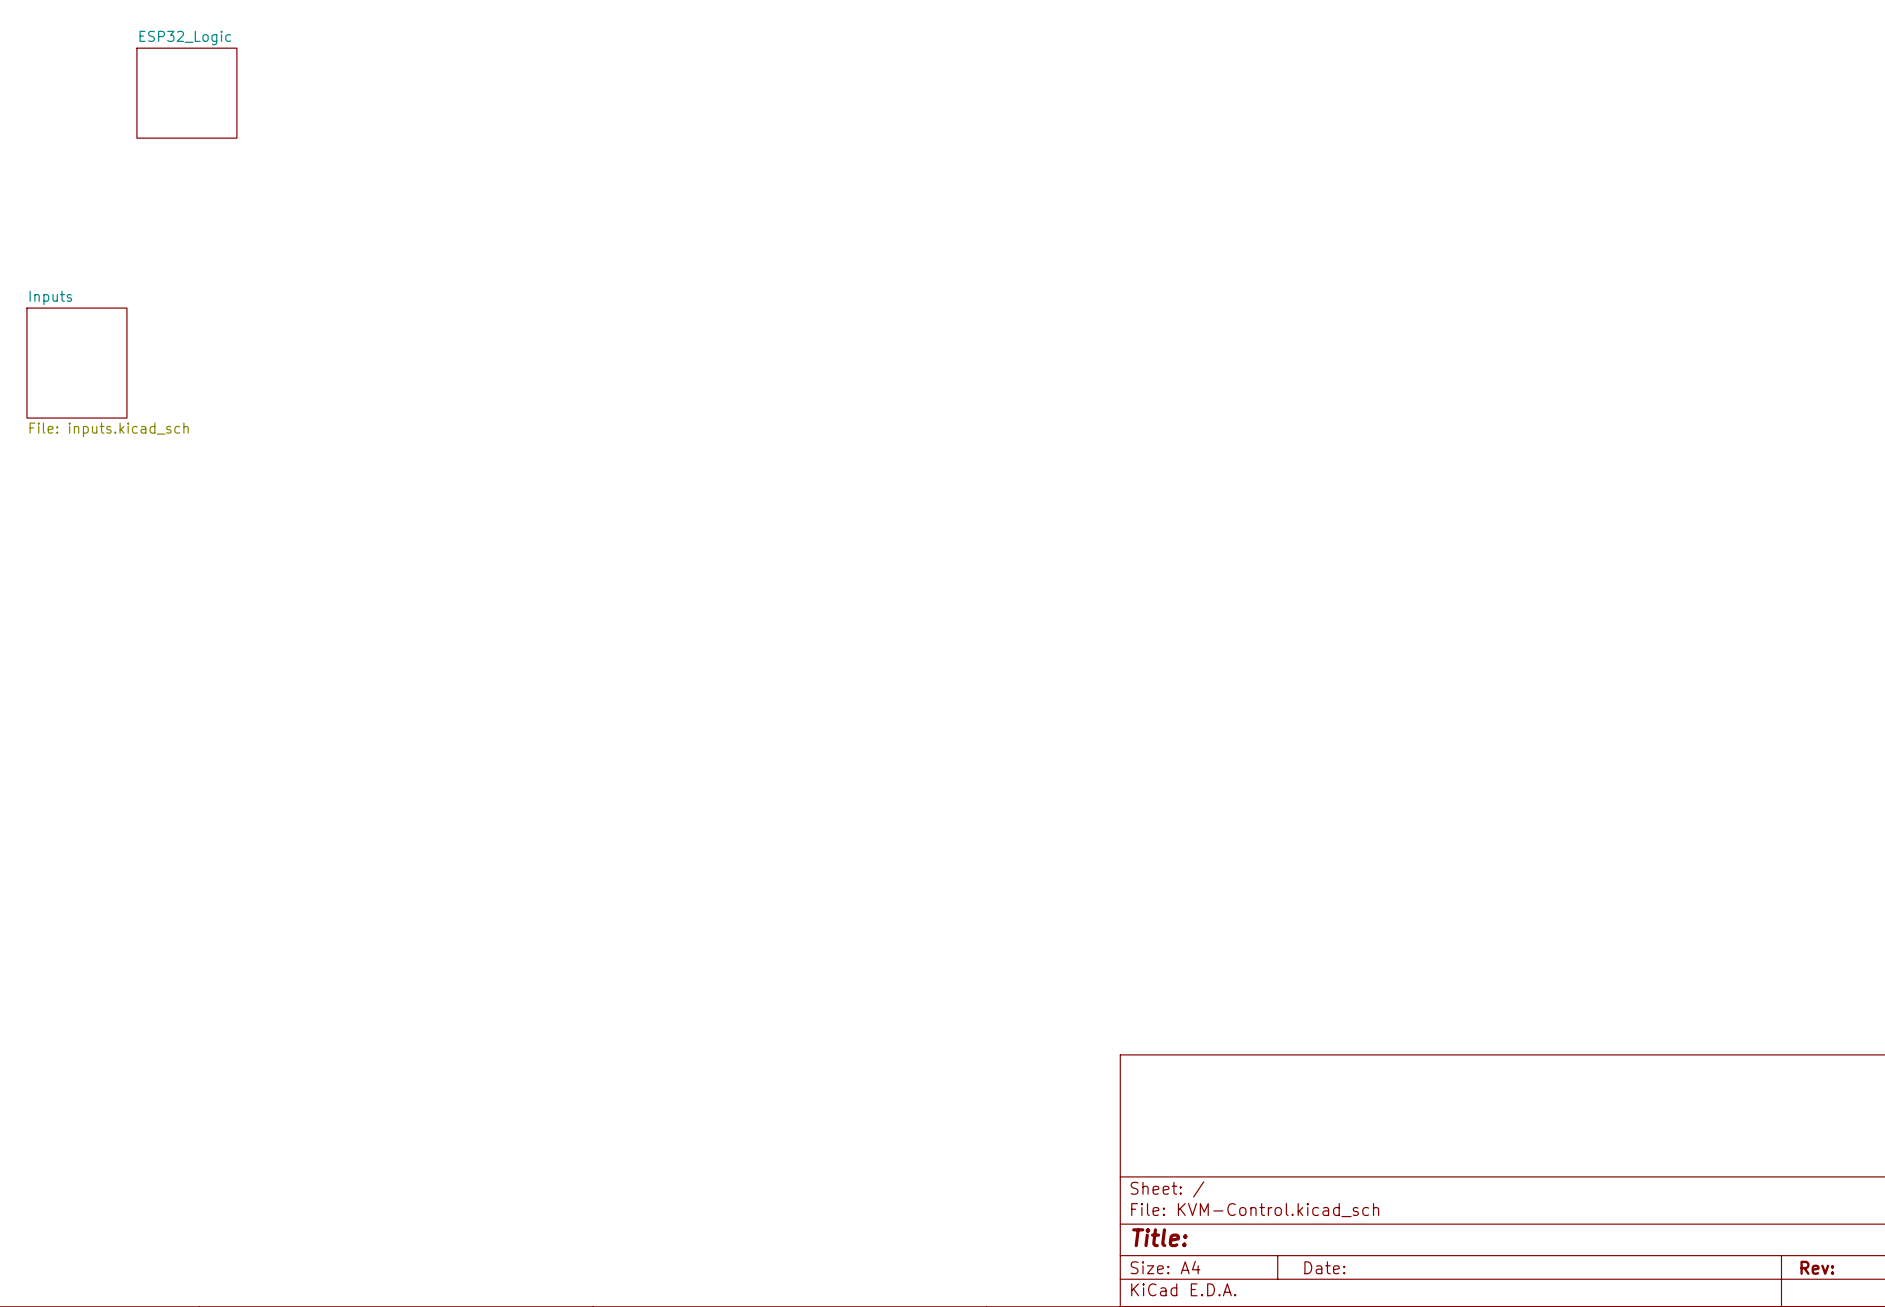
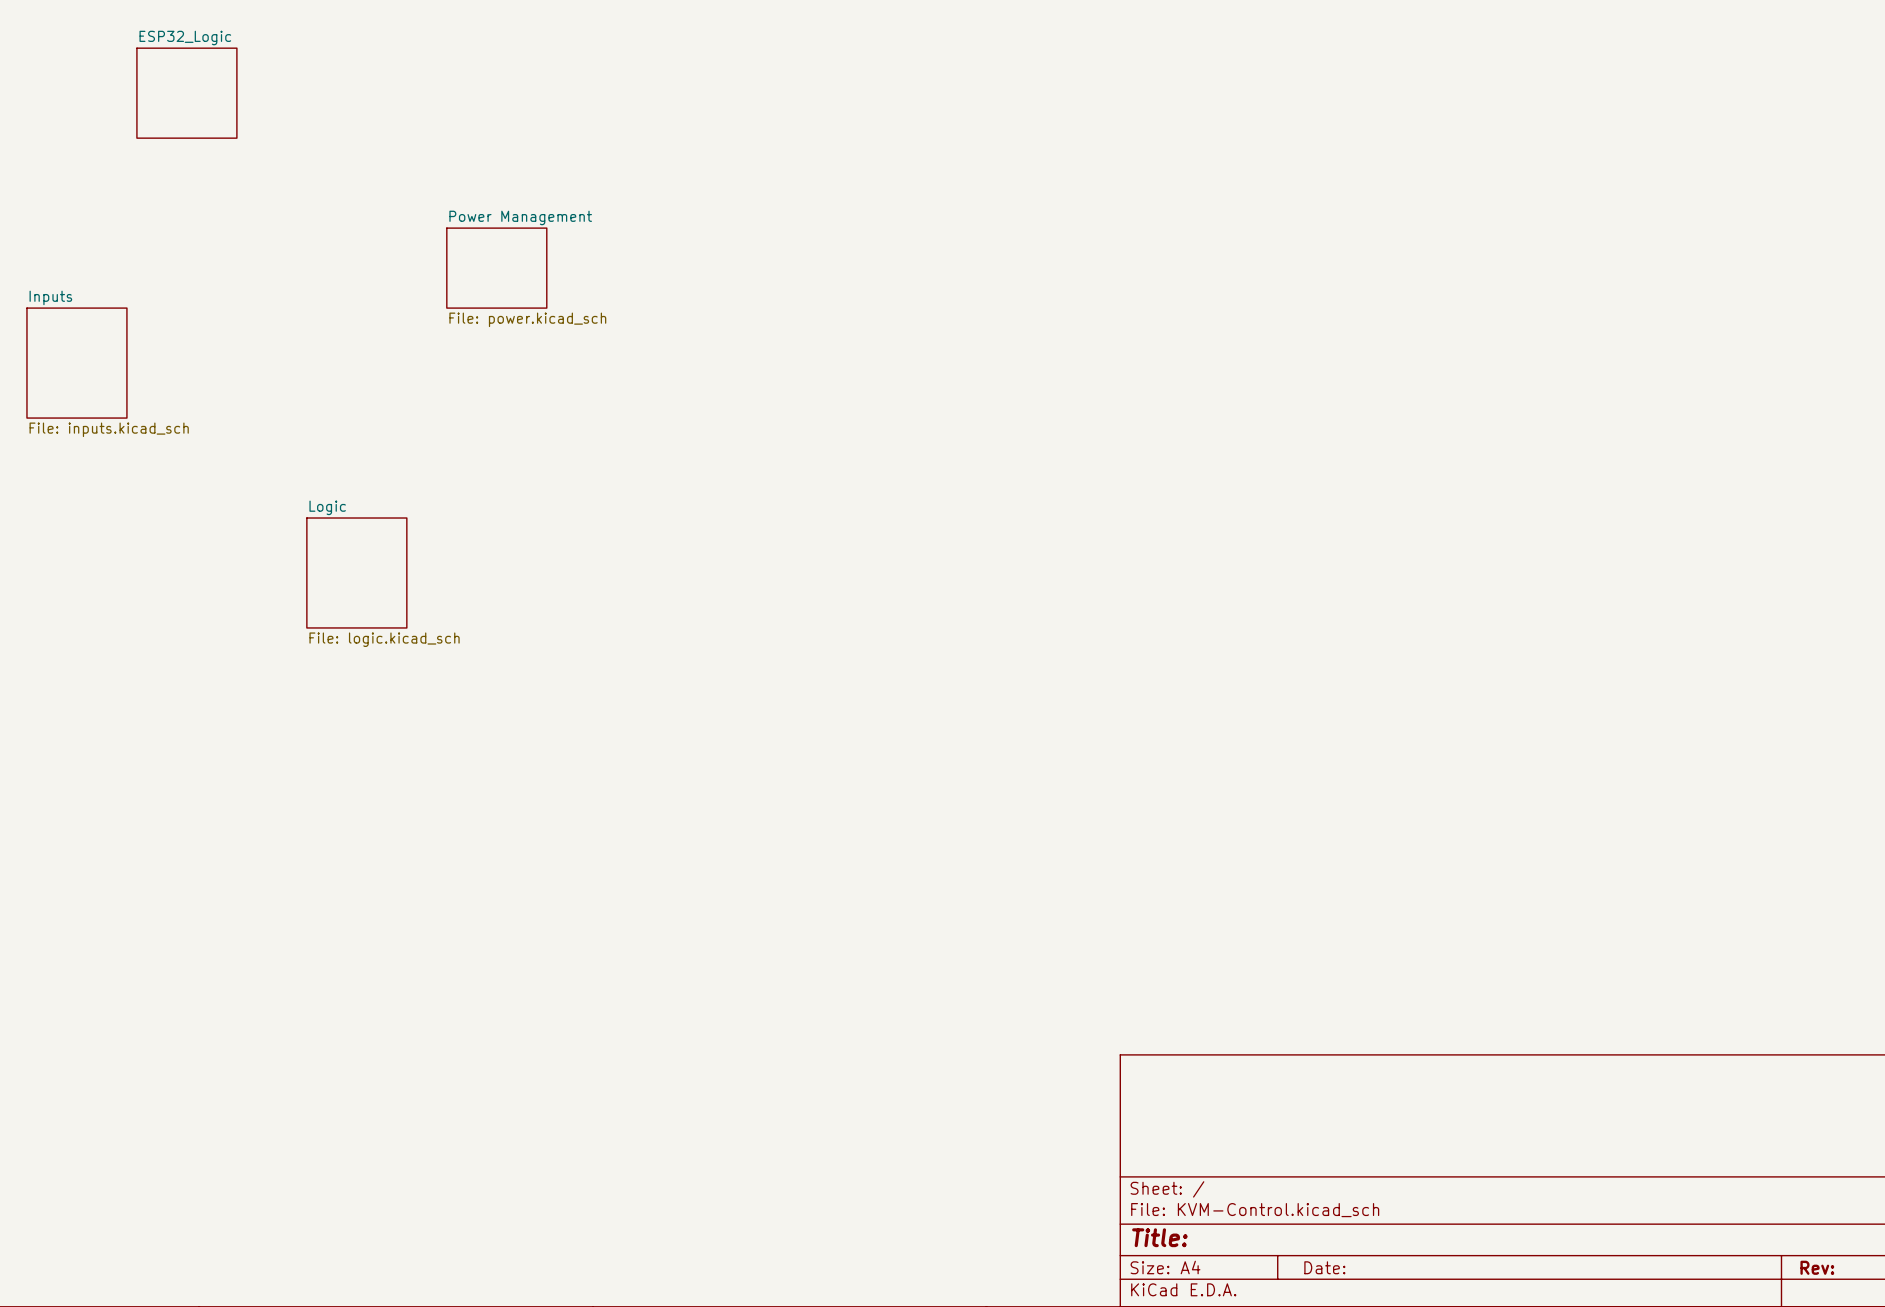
sheet Power Management: none -> File: power.kicad_sch (496, 268)
sheet Logic: none -> File: logic.kicad_sch (356, 572)

